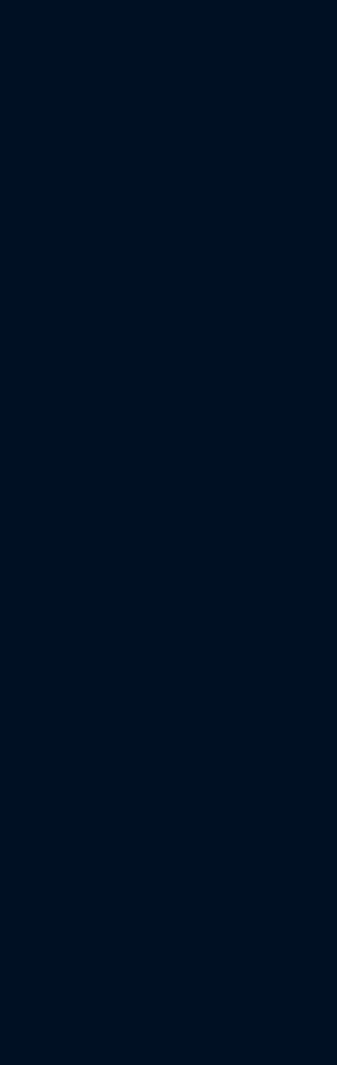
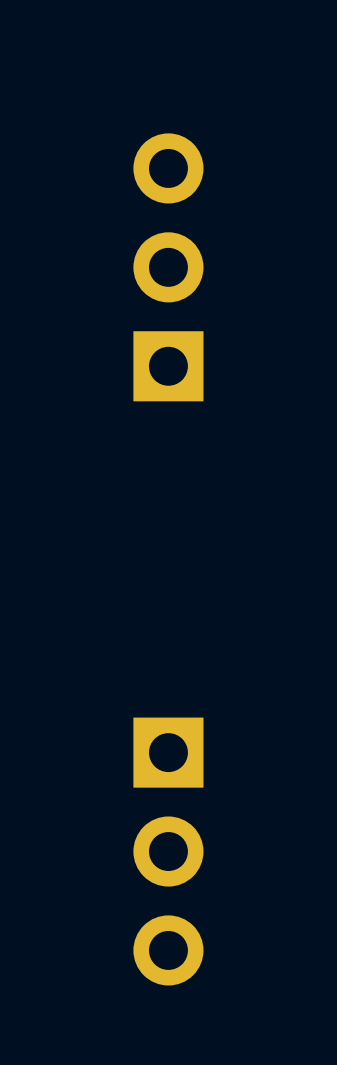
part: none -> (168, 267)
part: none -> (168, 851)

